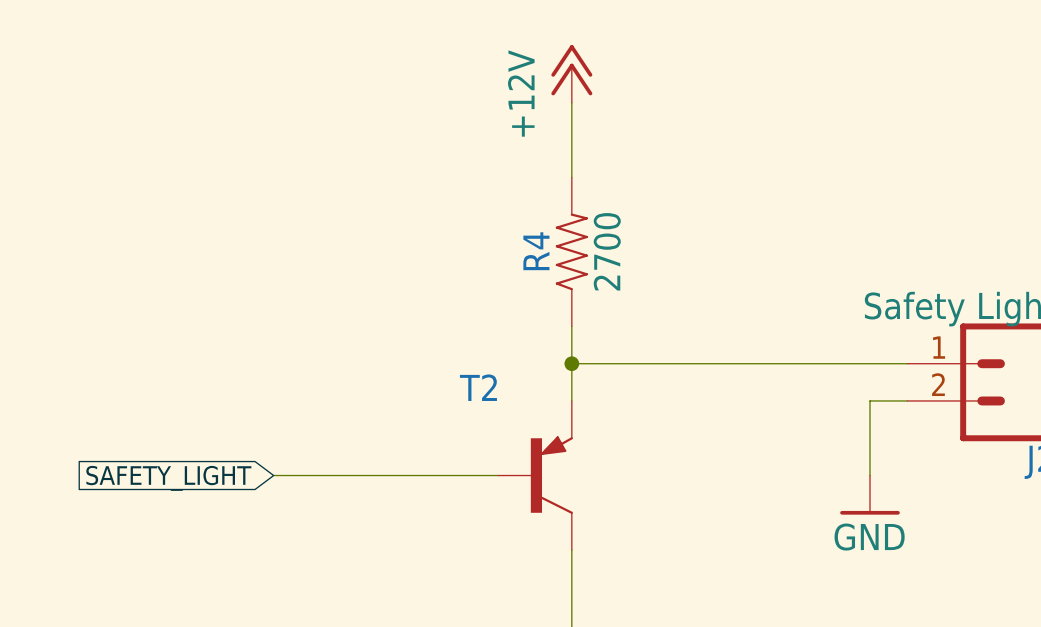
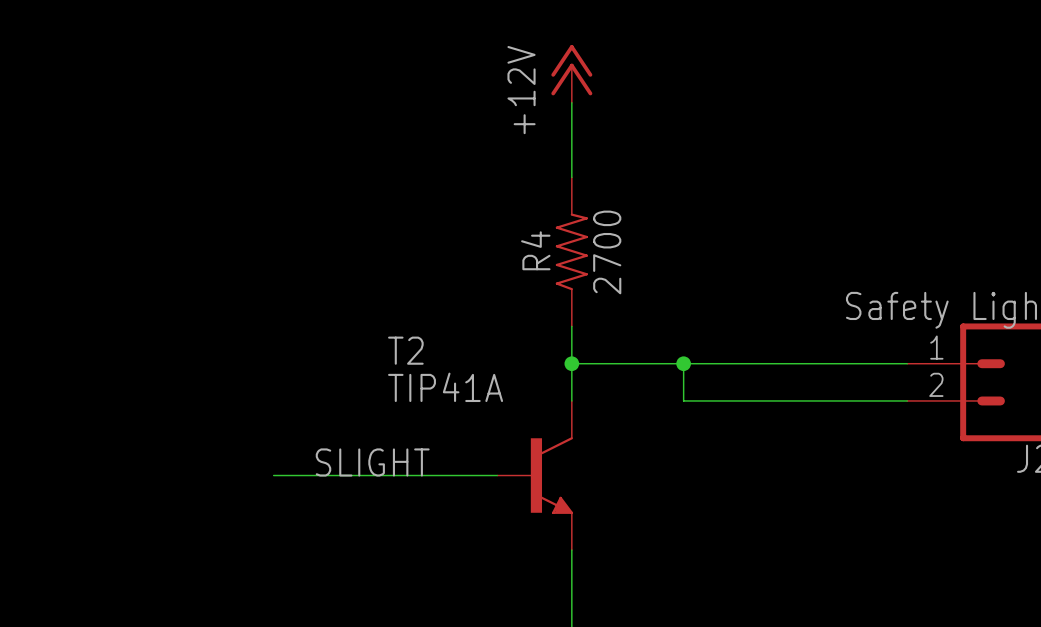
junction: none -> (683, 363)
T2 value: none -> TIP41A (445, 387)
T2 name position: T2 (478, 387) -> T2 (405, 350)
T2 symbol: [497, 400, 573, 551] -> [497, 400, 573, 551]
wire: (869, 400) (869, 475) -> (869, 400) (683, 400) (683, 363)
label: none -> SLIGHT (372, 462)
global label: SAFETY_LIGHT (168, 478) -> none
power symbol: GND (869, 495) -> none

